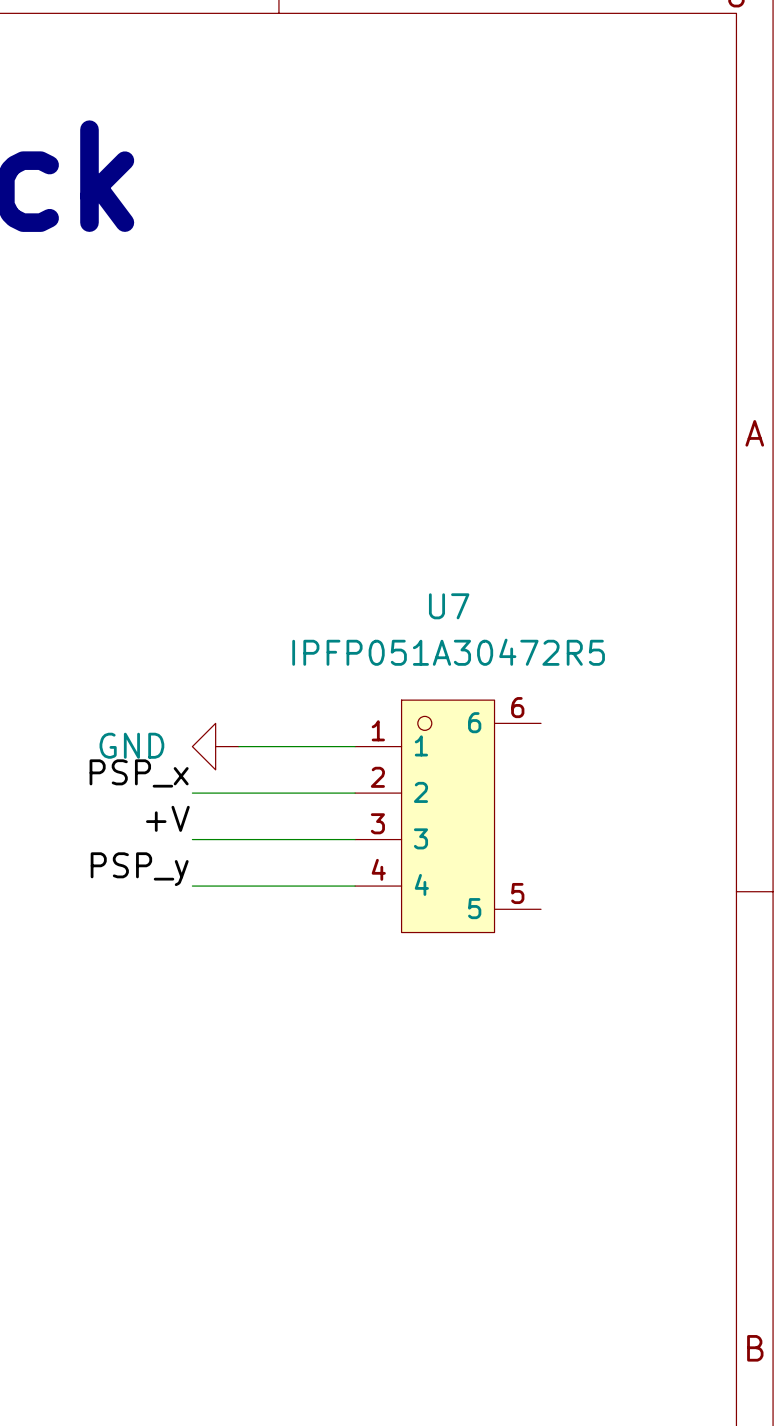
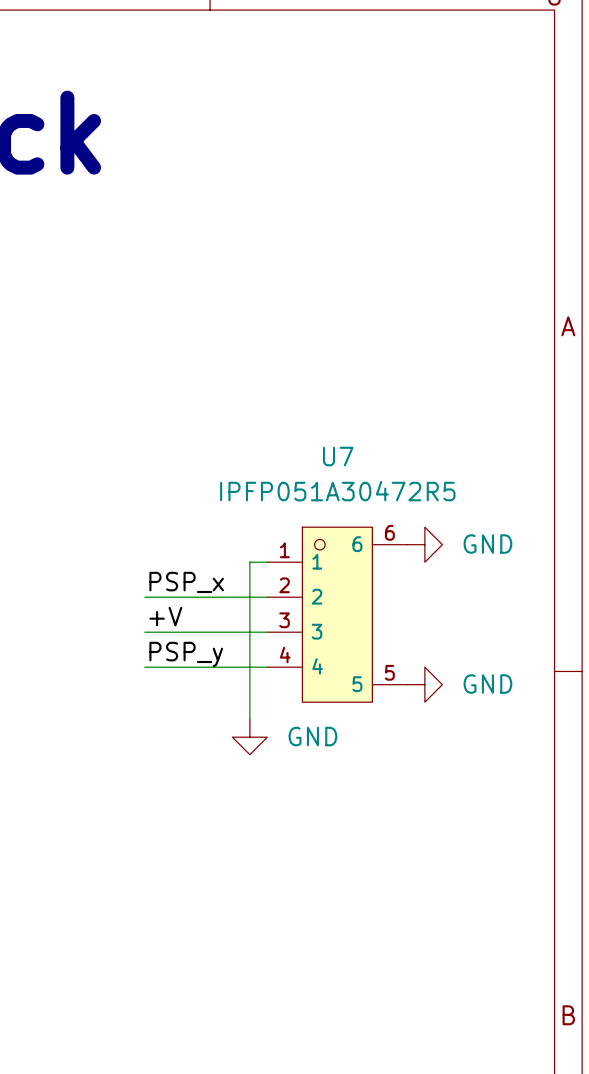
power symbol: none -> GND (424, 544)
power symbol: GND (215, 746) -> none
wire: (238, 746) (331, 746) -> (249, 719) (249, 562)
label position: PSP_x (139, 773) -> PSP_x (186, 582)
label position: +V (167, 818) -> +V (165, 616)
label position: PSP_y (139, 869) -> PSP_y (186, 654)
power symbol: none -> GND (424, 684)
power symbol: none -> GND (249, 737)

